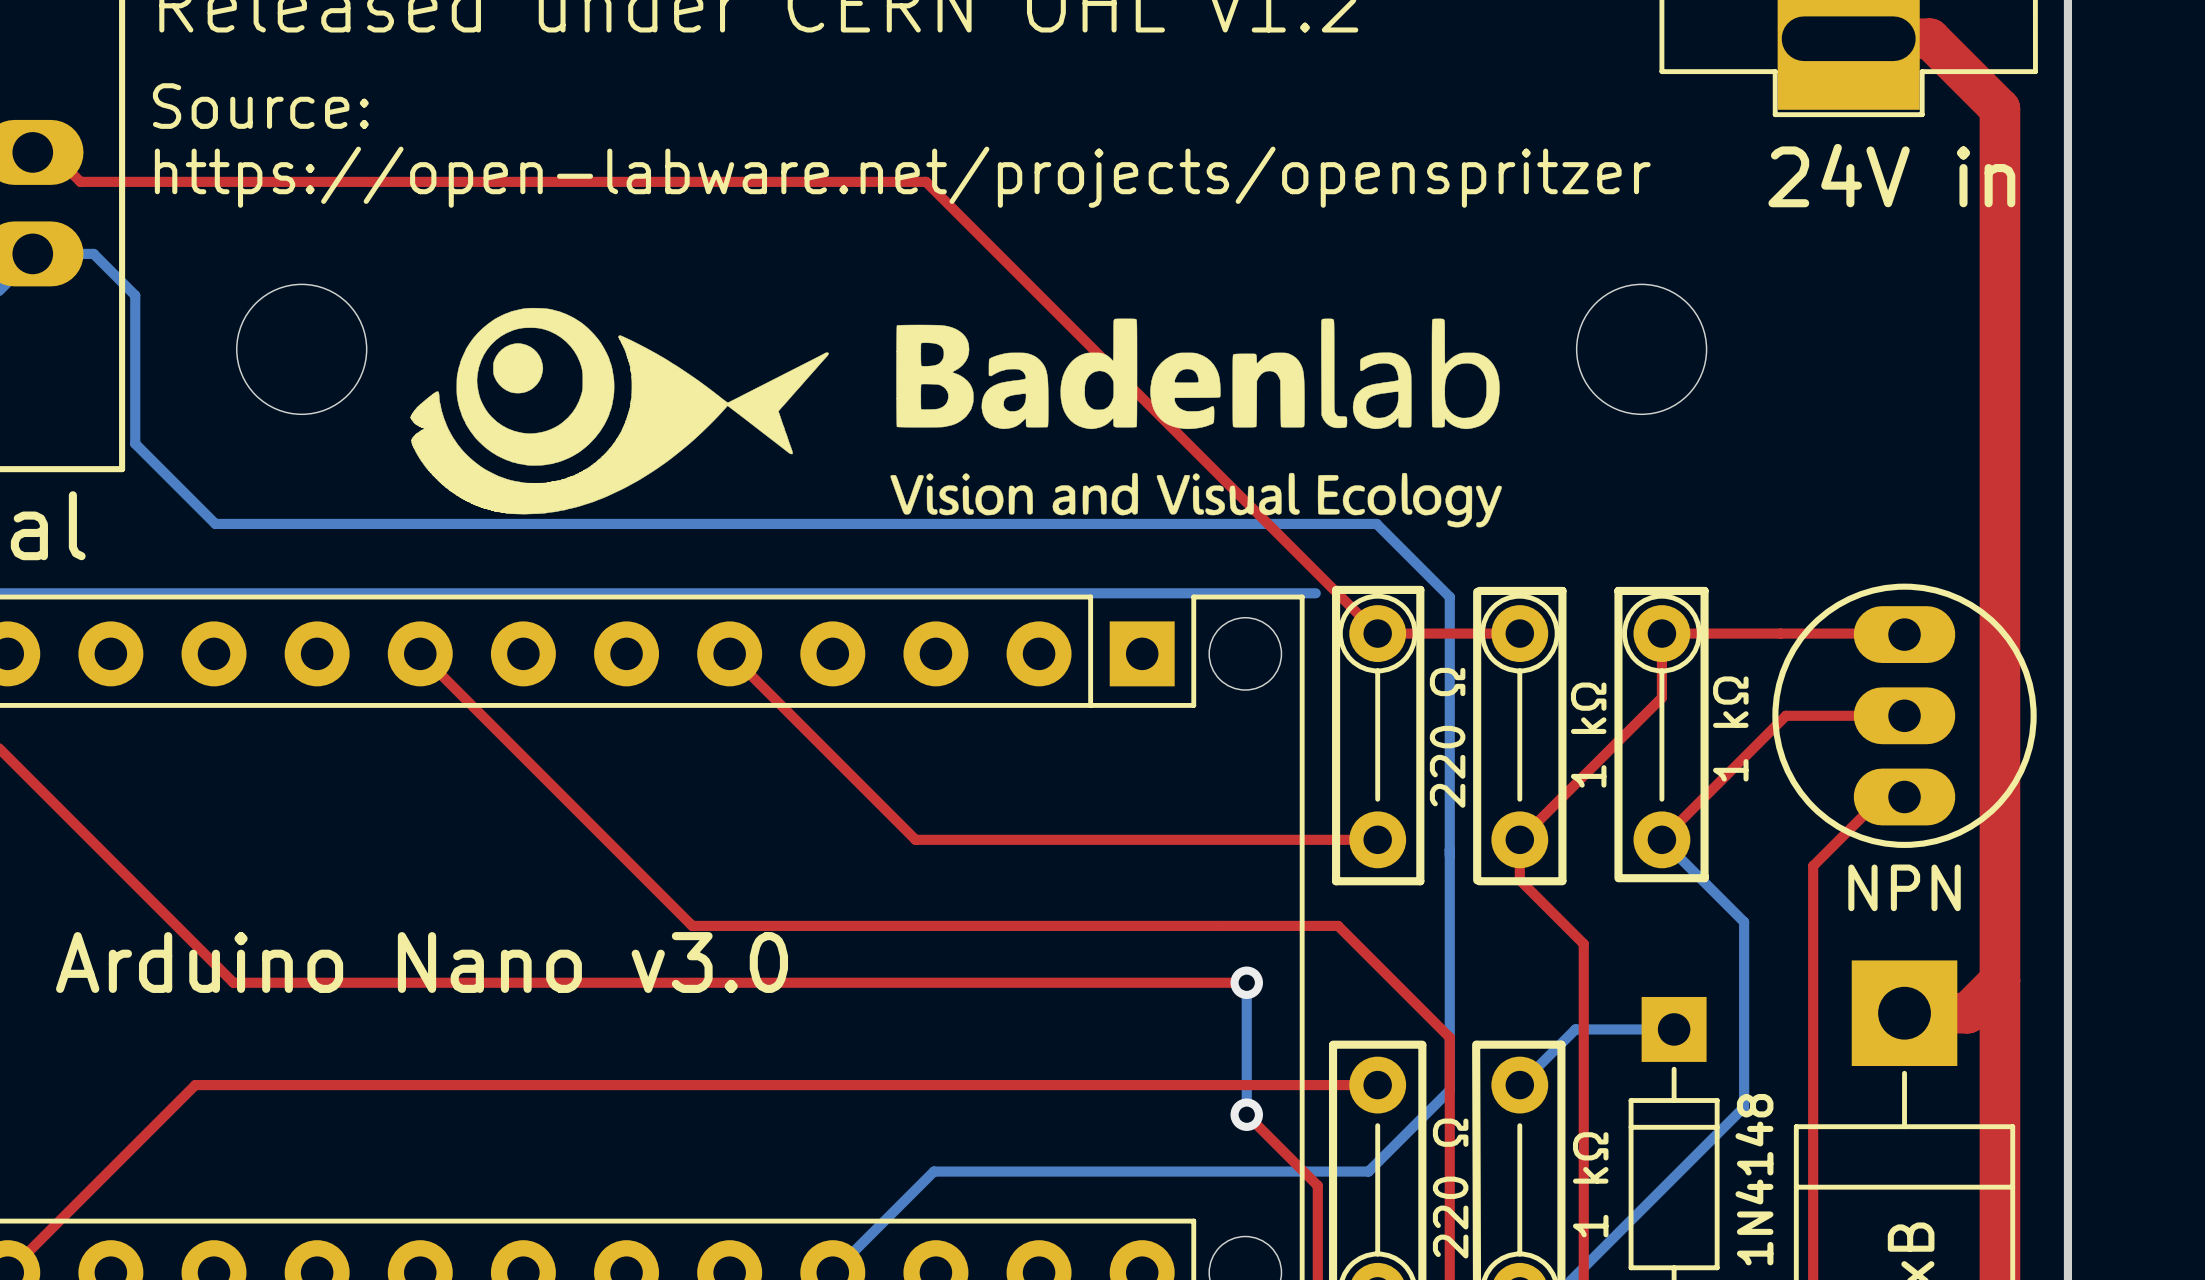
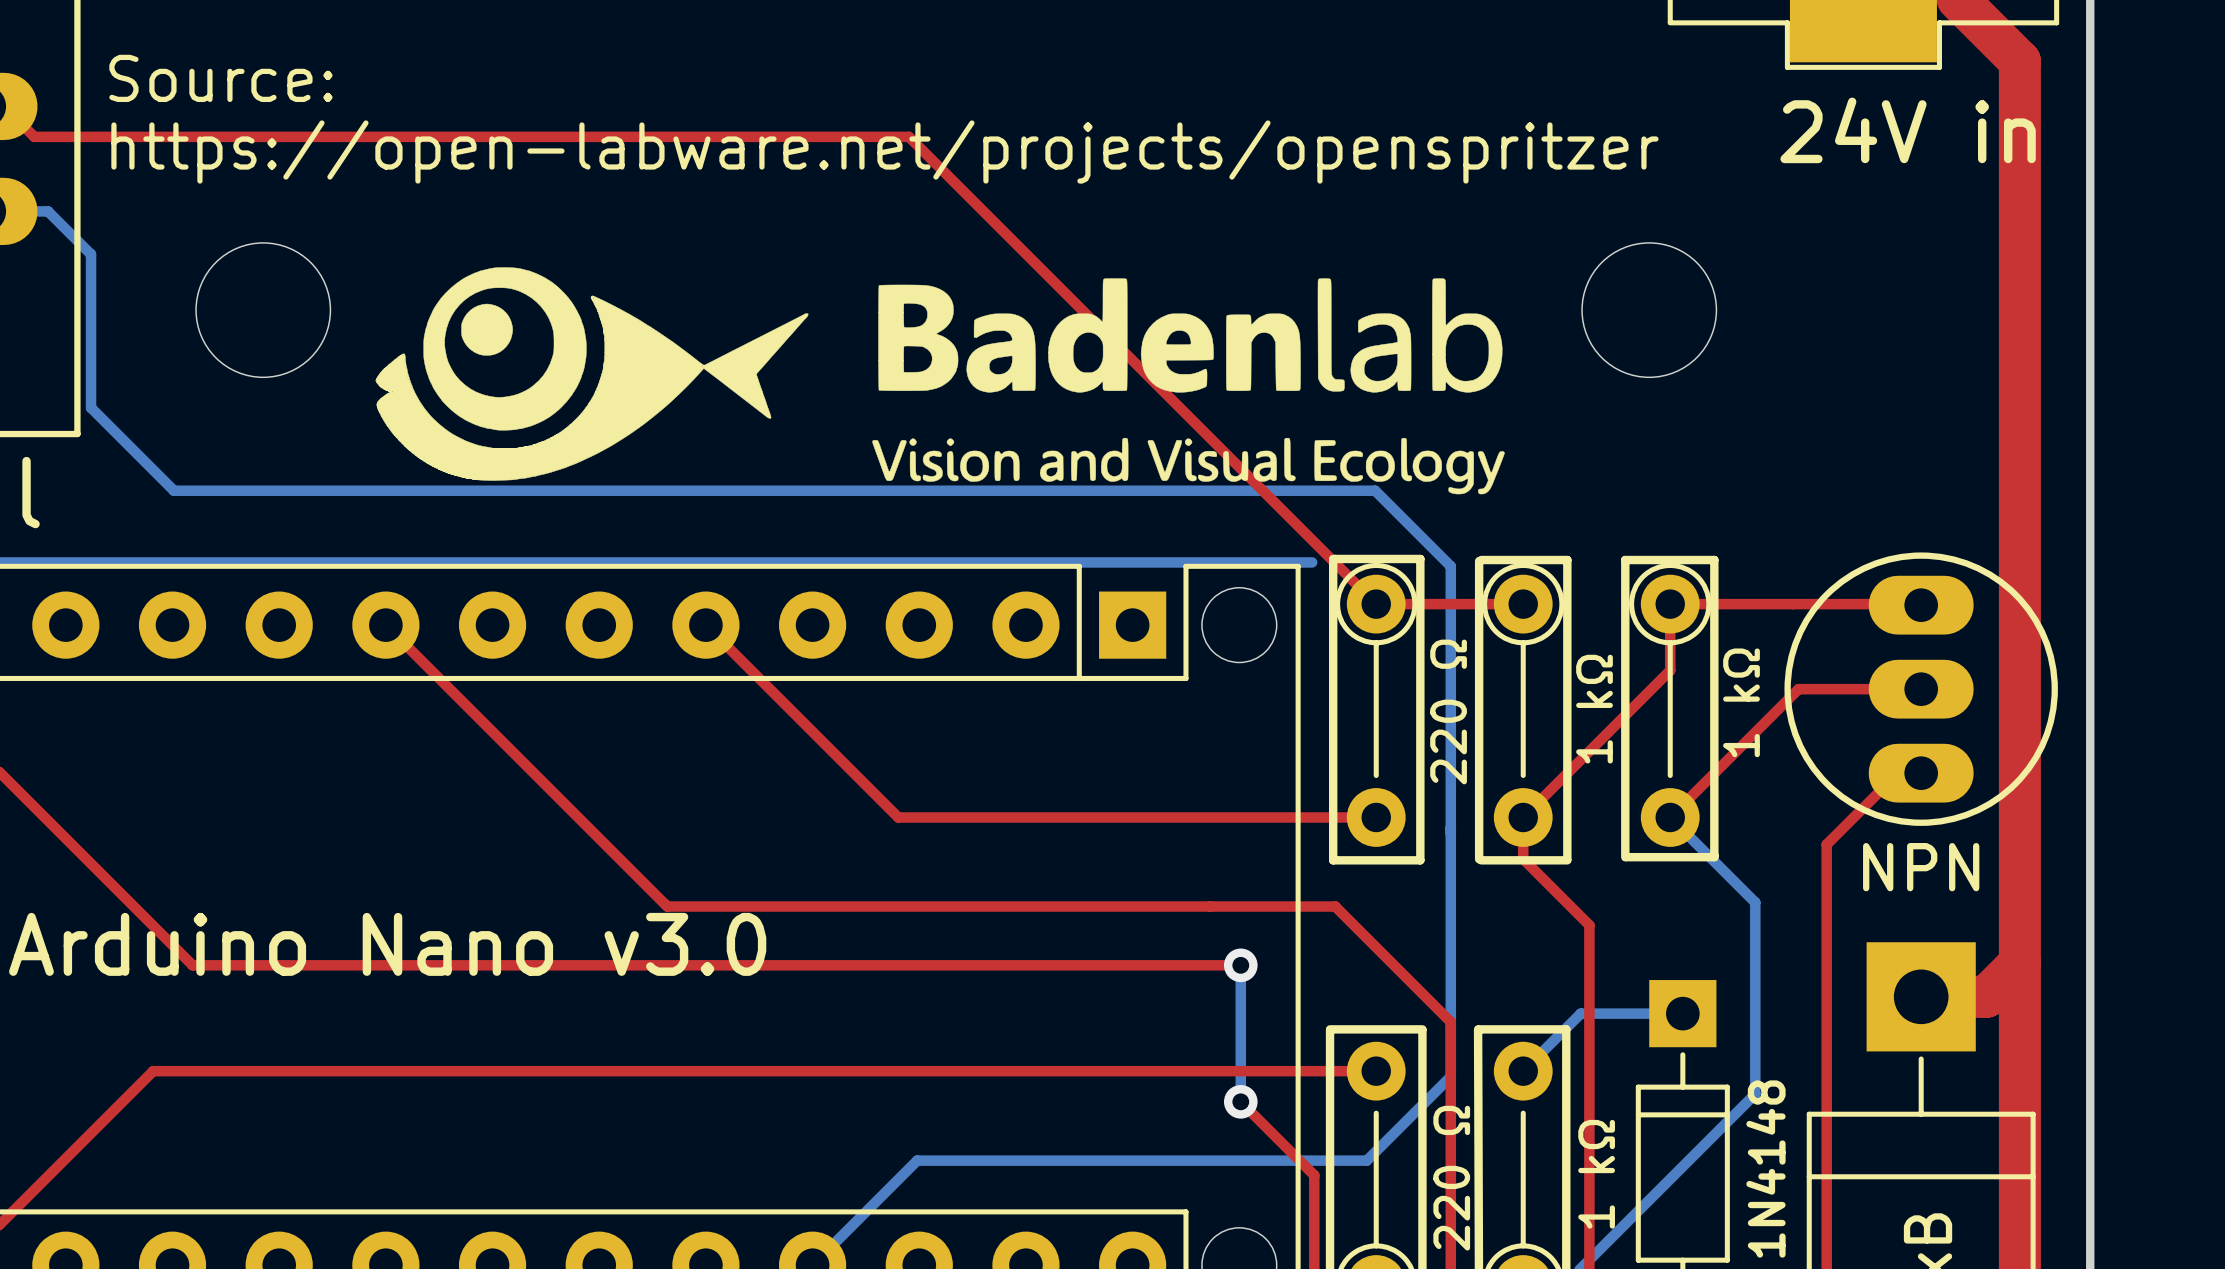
text position: Source: (260, 106) -> Source: (220, 78)
text position: https://open-labware.net/projects/openspritzer (902, 177) -> https://open-labware.net/projects/openspritzer (884, 152)

